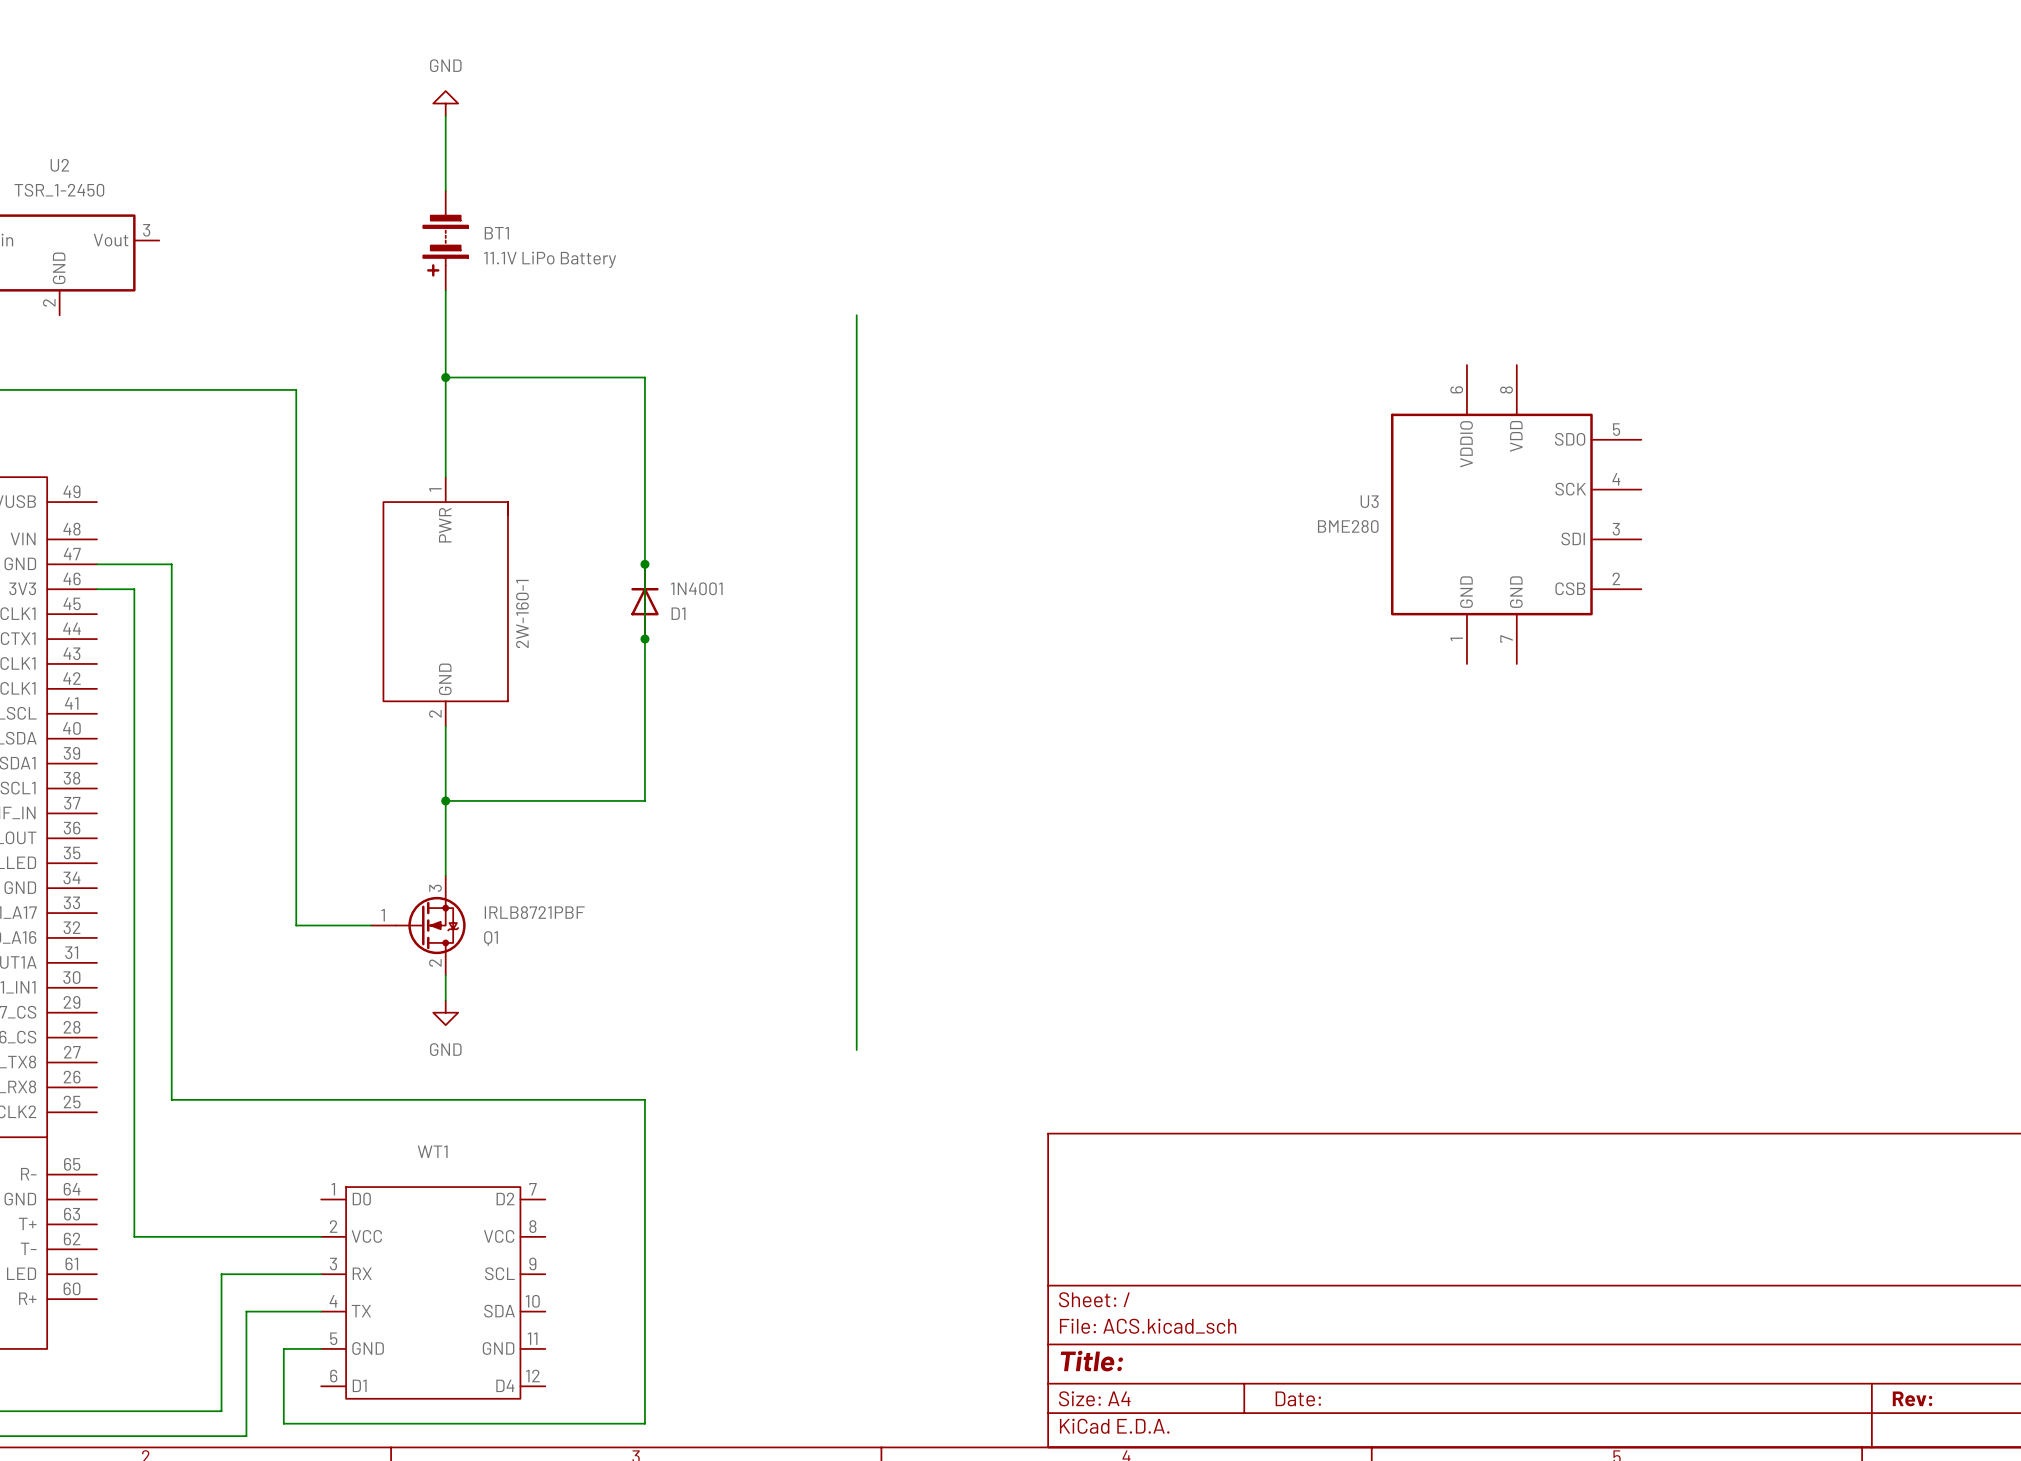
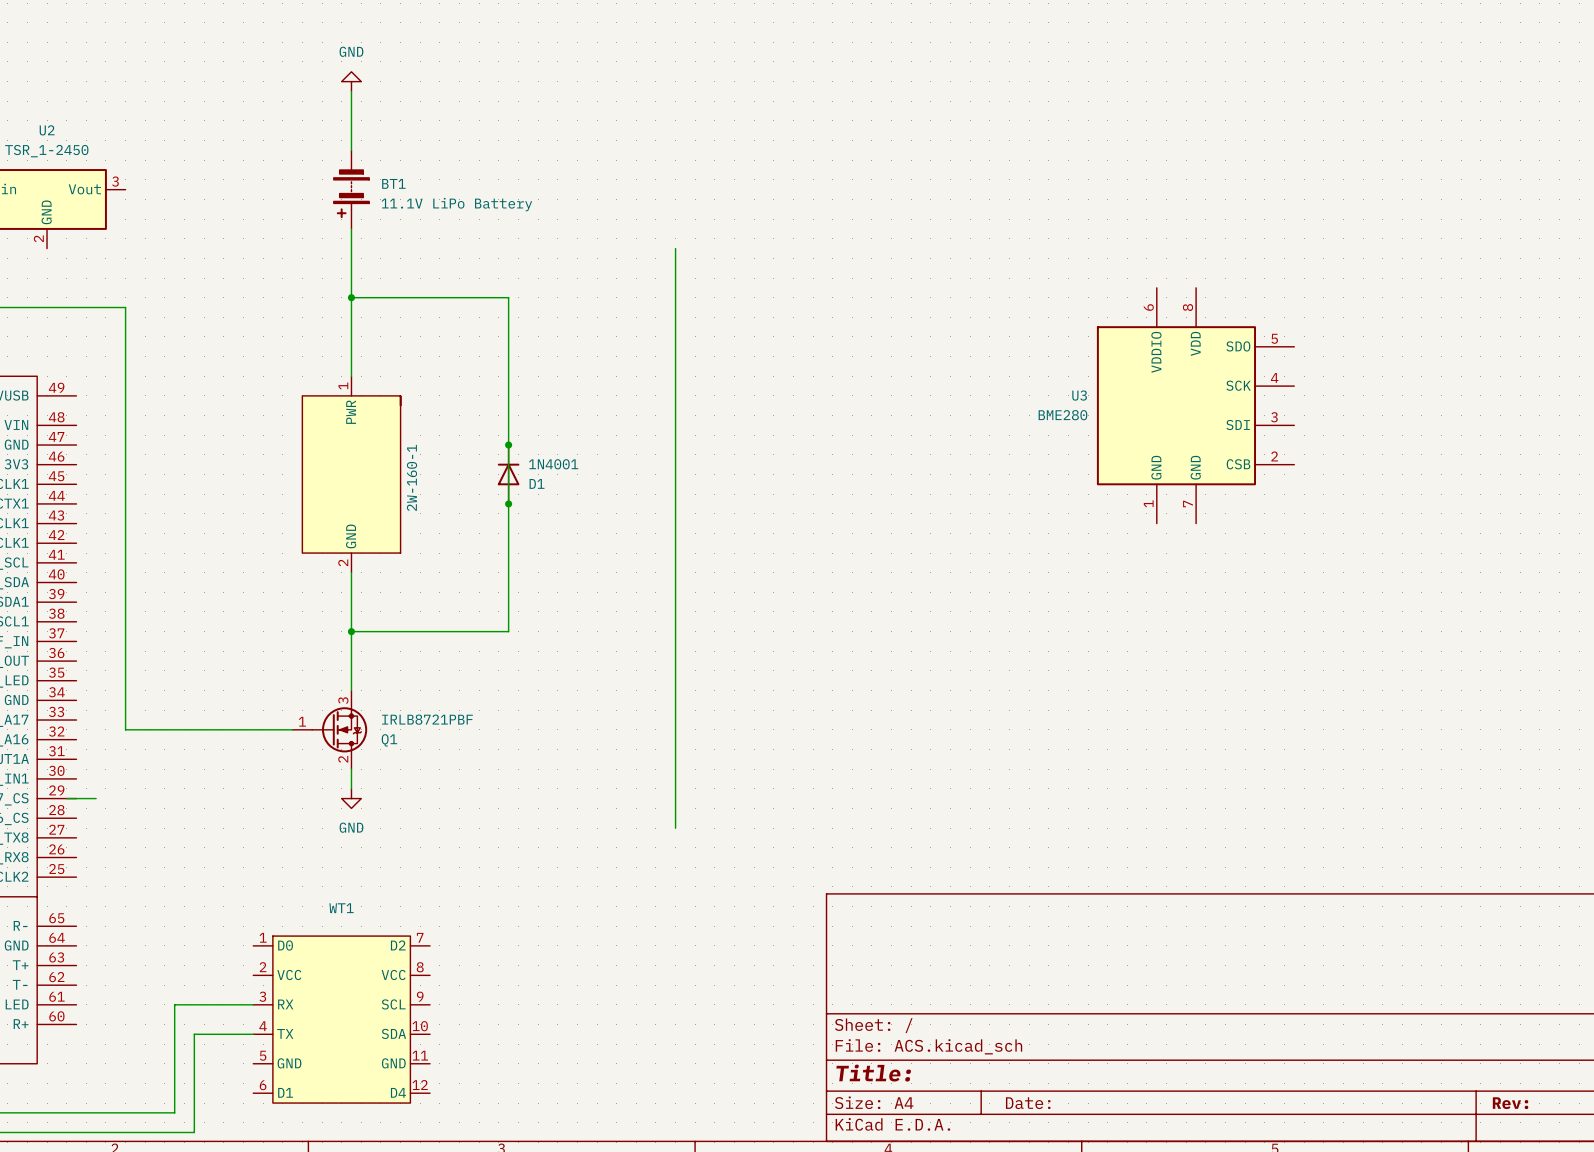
wire: (159, 389) (296, 389) (296, 925) -> (125, 307) (125, 729) (233, 729)
wire: (96, 564) (171, 564) (171, 1099) (644, 1099) (644, 1423) (283, 1423) (283, 1348) (321, 1348) -> none
wire: (96, 589) (134, 589) (134, 1236) (321, 1236) -> none
wire: none -> (66, 798) (96, 798)

